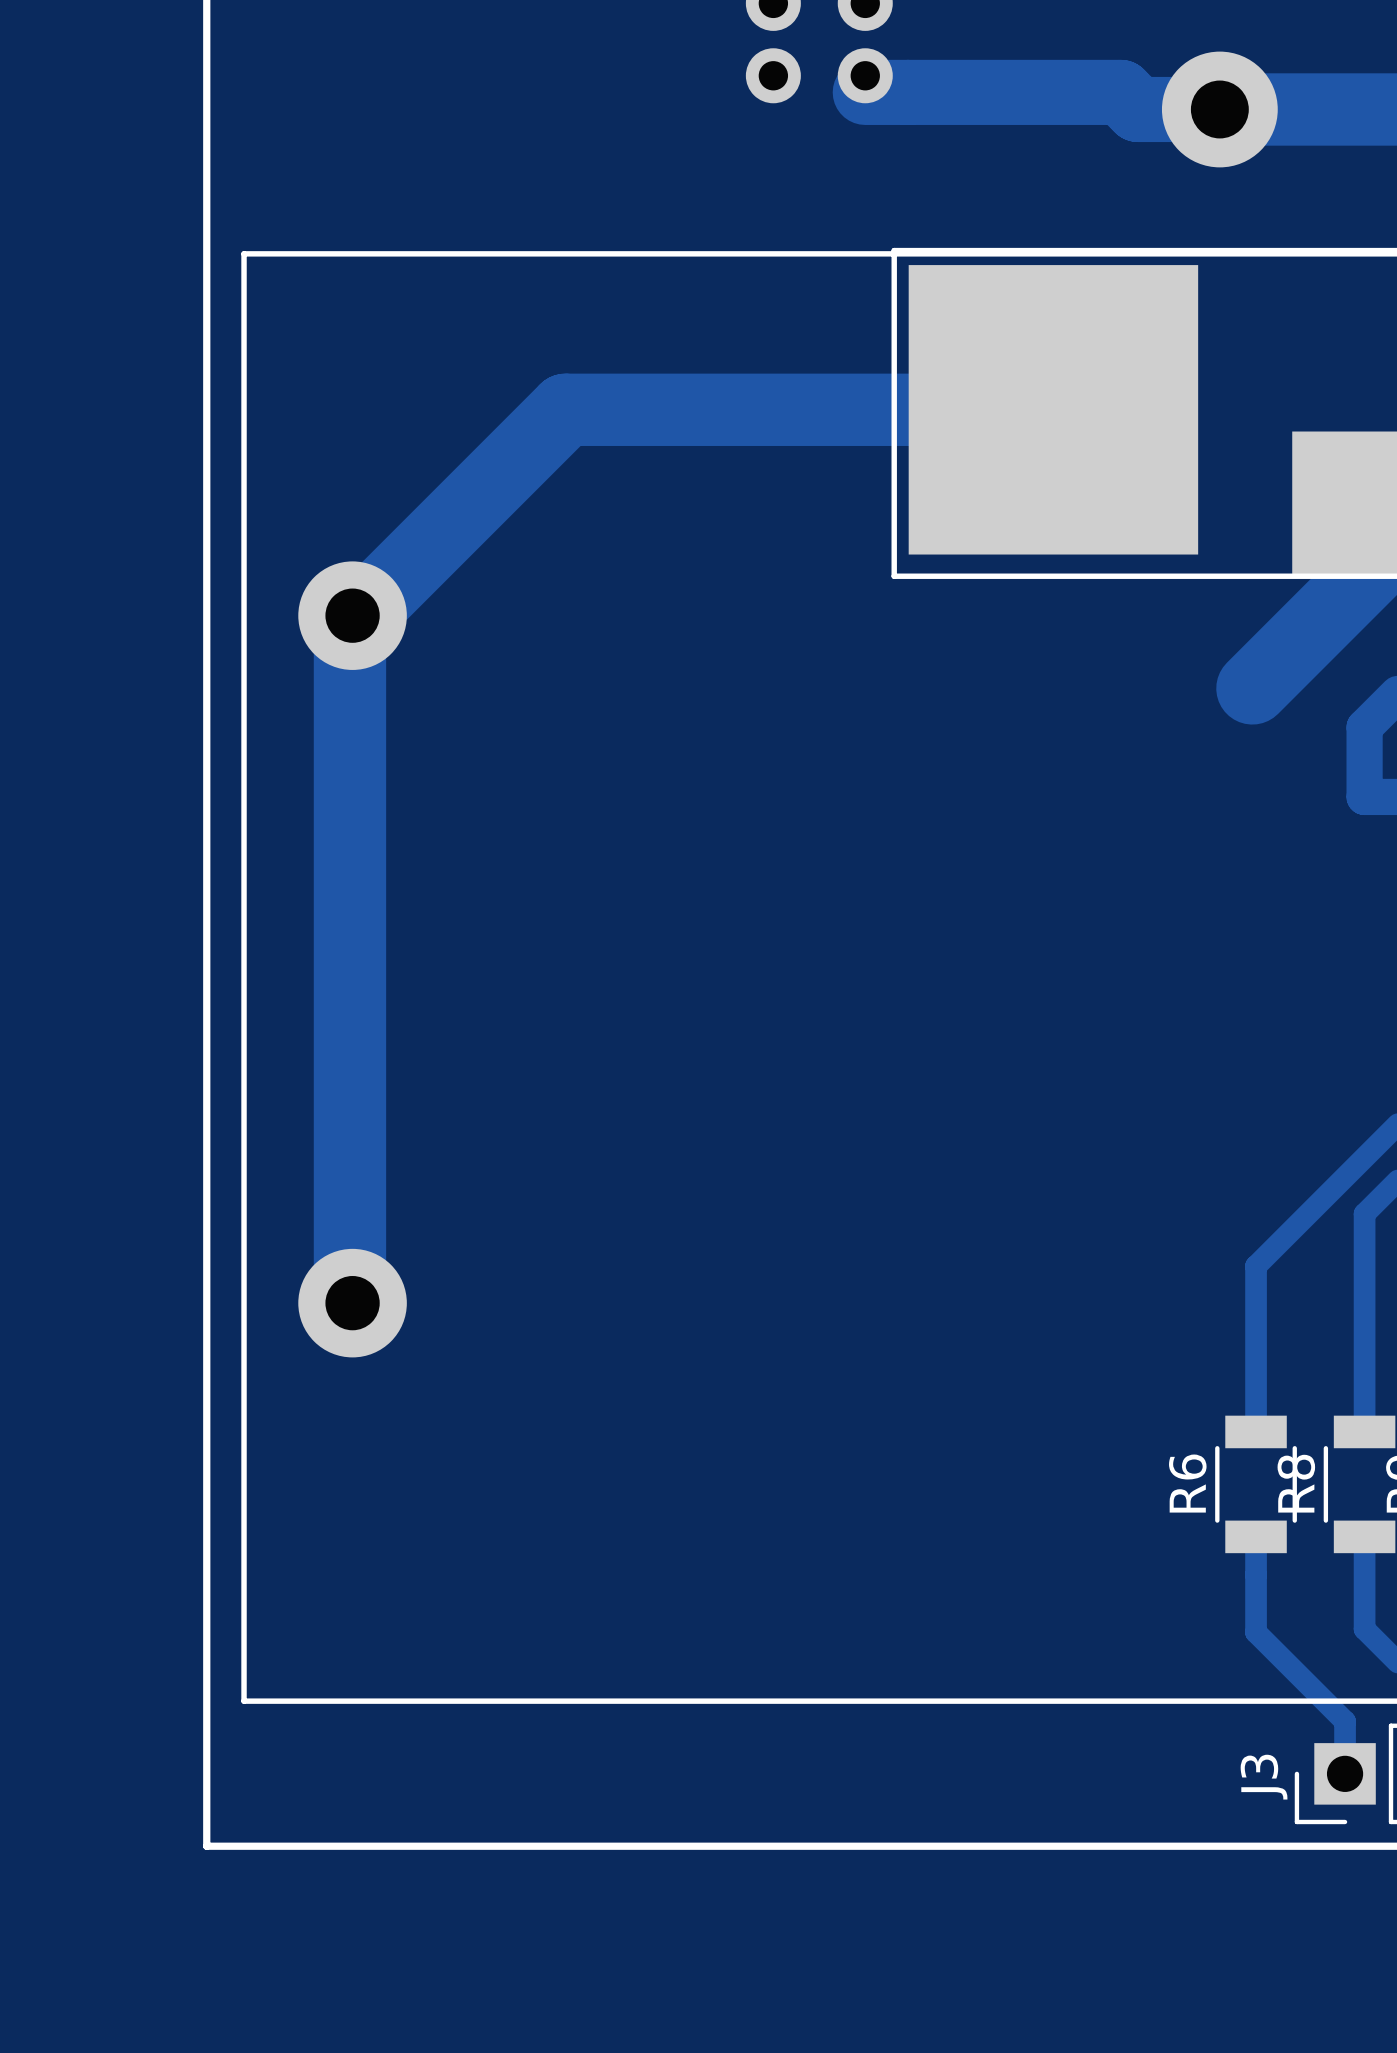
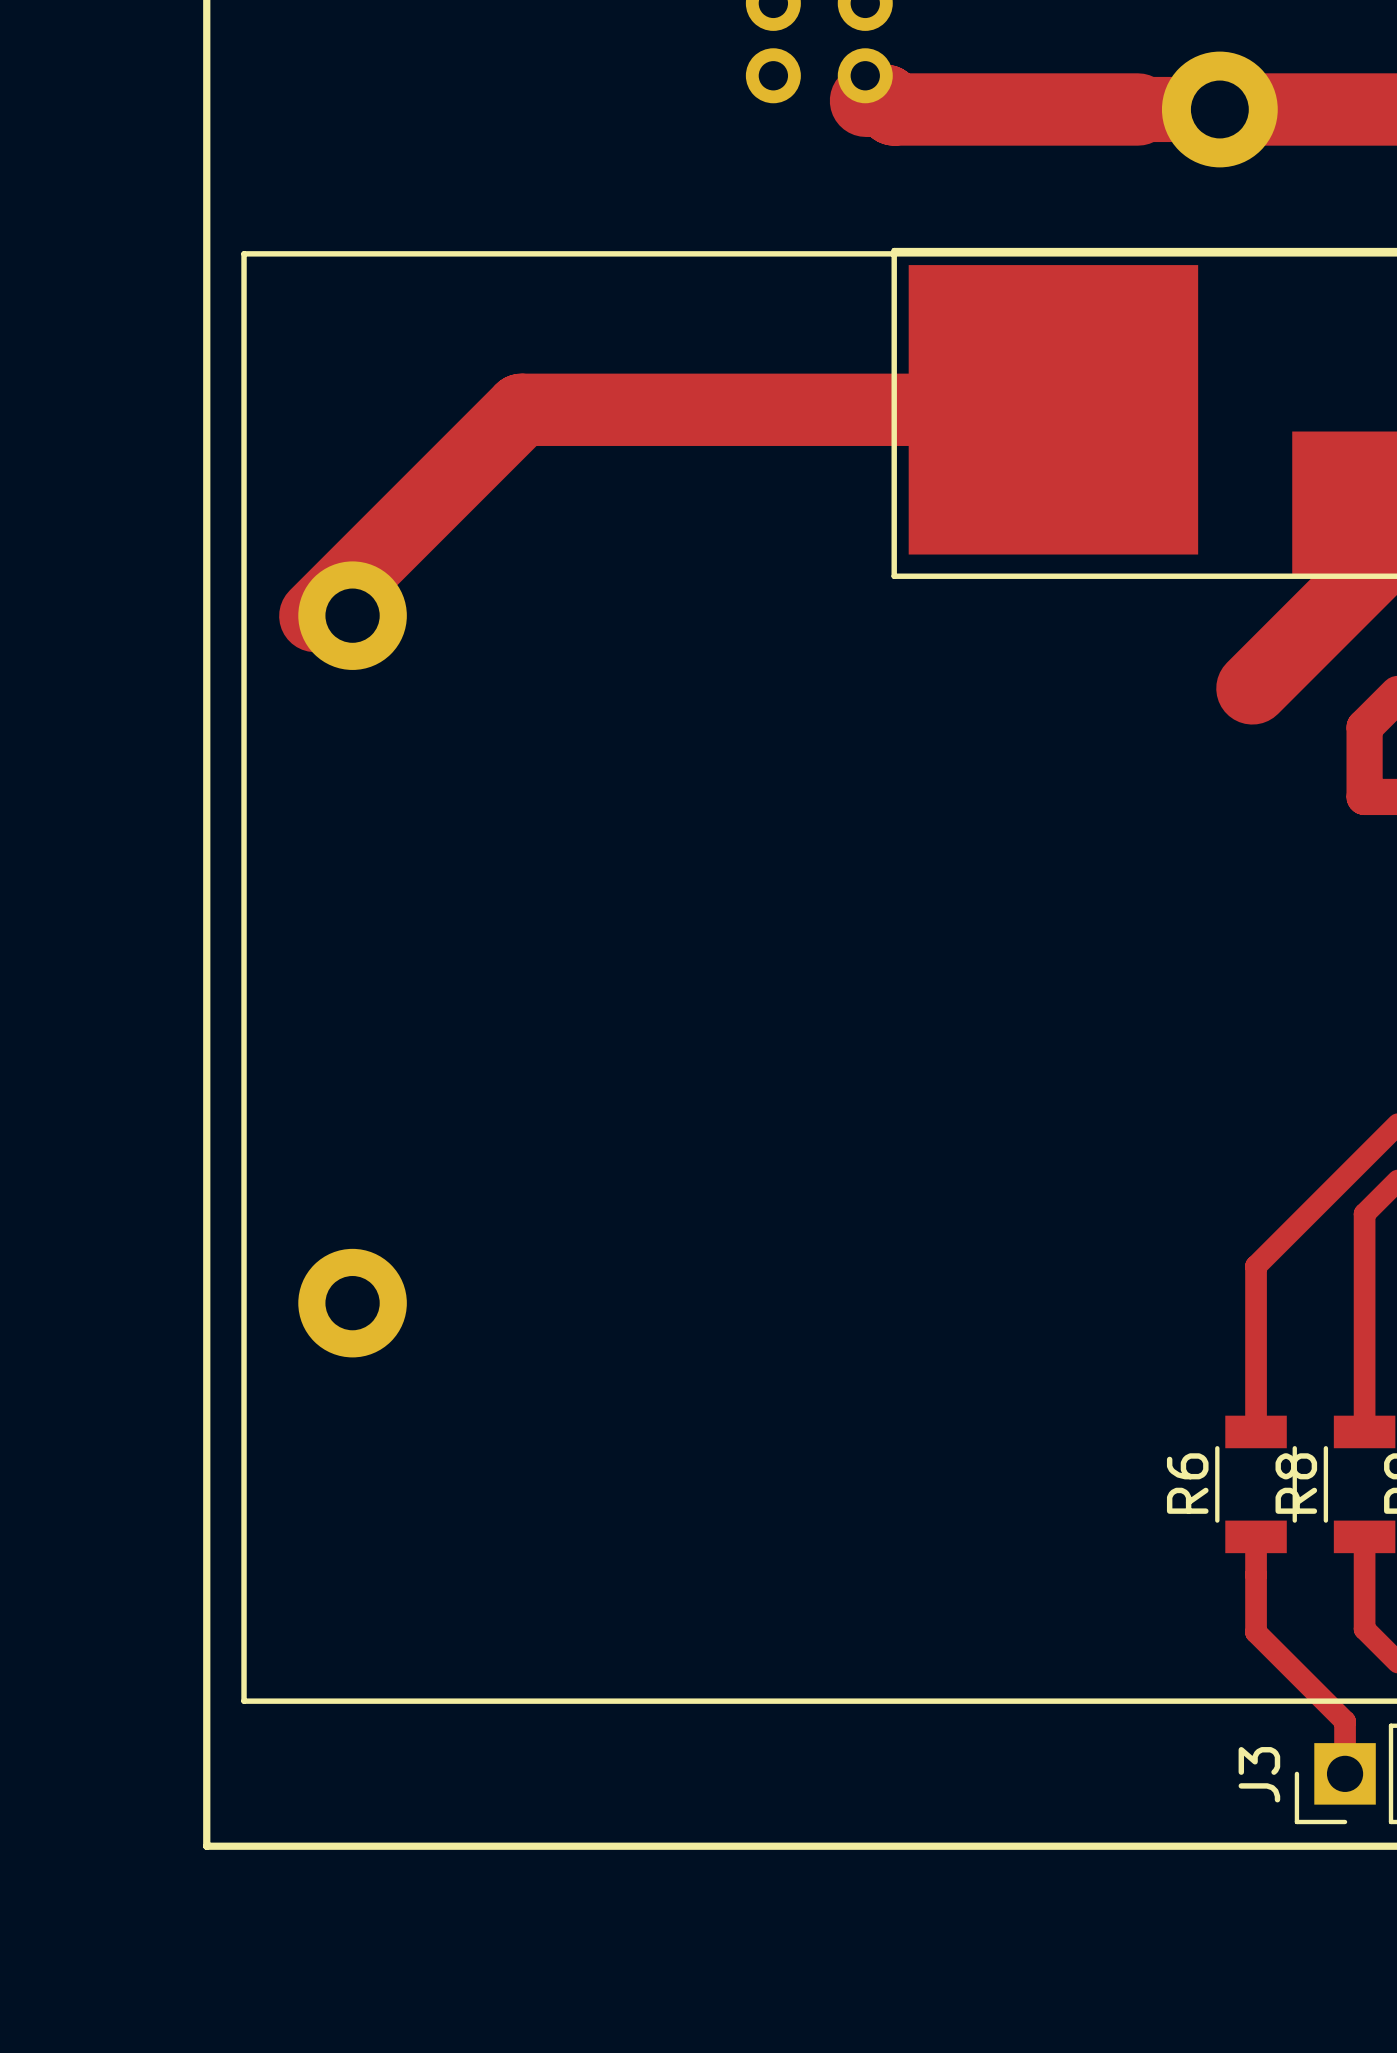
track: (865, 92) (1120, 92) (1137, 109) -> (866, 100) (885, 100) (894, 109) (1137, 109)
track: (565, 409) (349, 625) (349, 1312) -> (565, 409) (521, 409) (315, 616)

